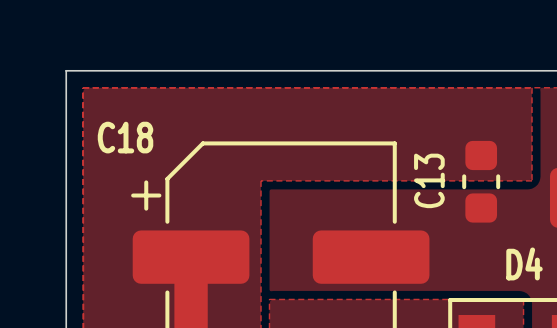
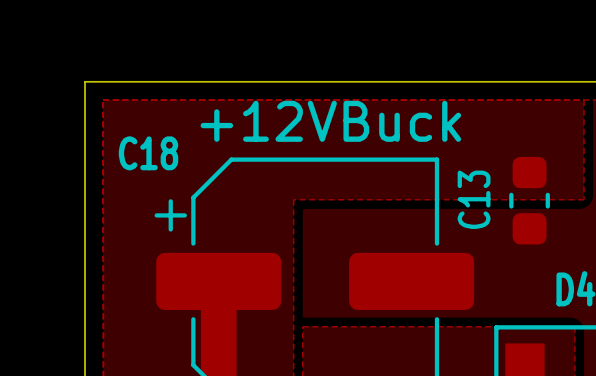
text: none -> +12VBuck (330, 121)

